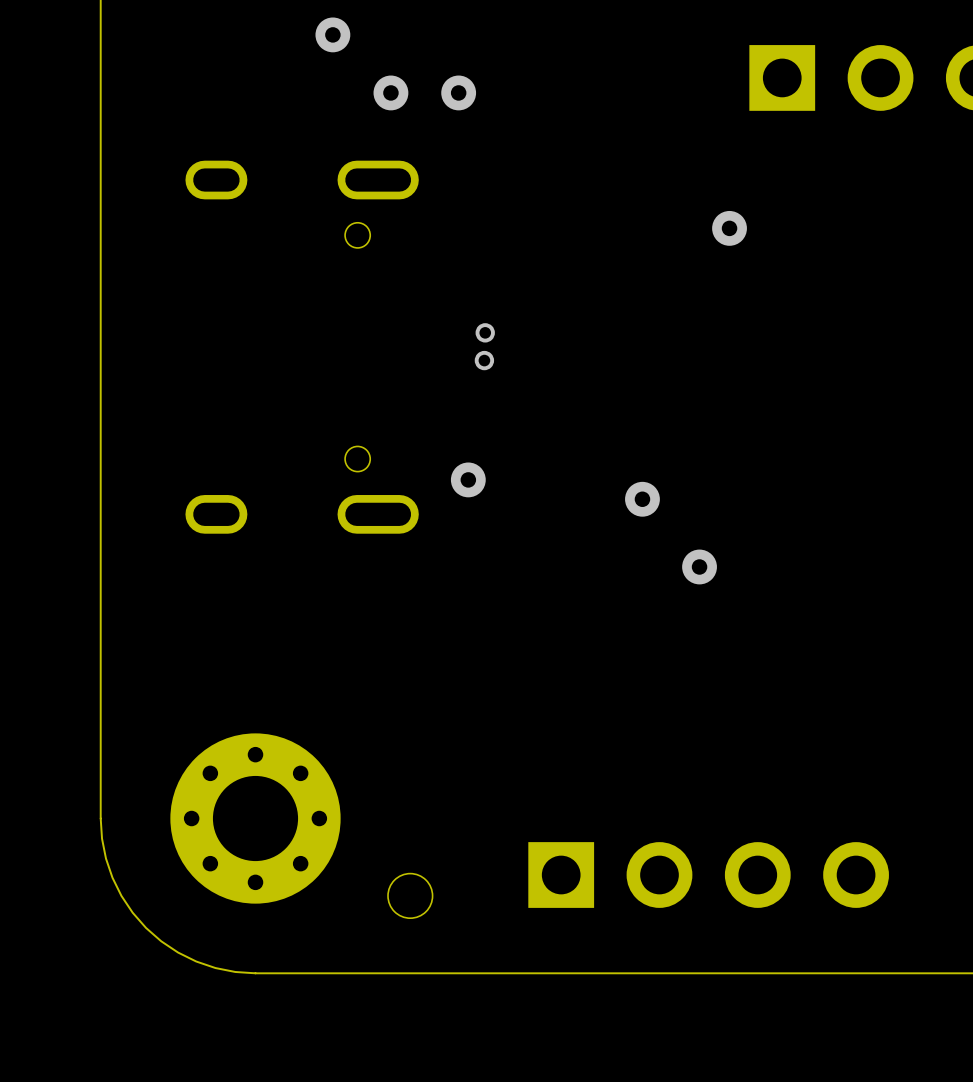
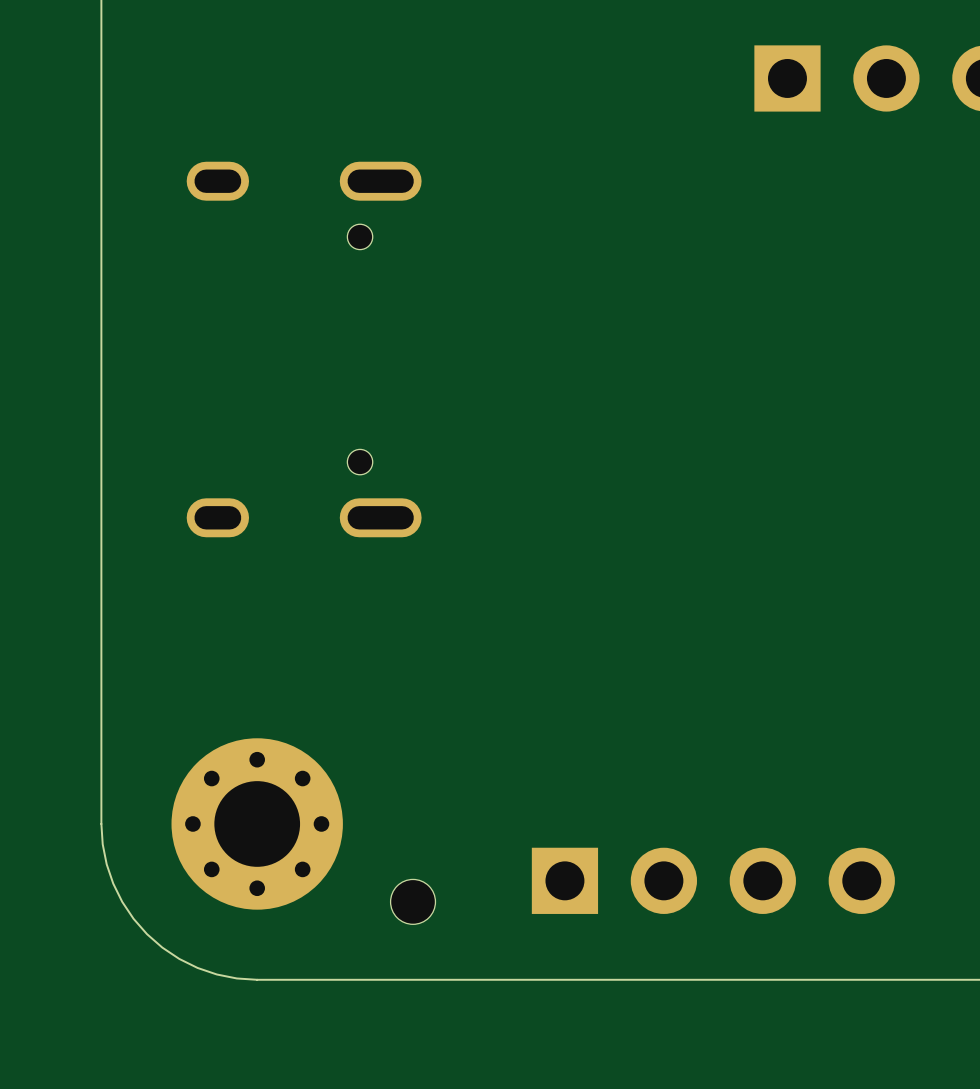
via: (332, 34) -> none
via: (390, 92) -> none
via: (458, 92) -> none
via: (729, 228) -> none
via: (485, 332) -> none
via: (484, 360) -> none
via: (468, 479) -> none
via: (642, 499) -> none
via: (699, 566) -> none

